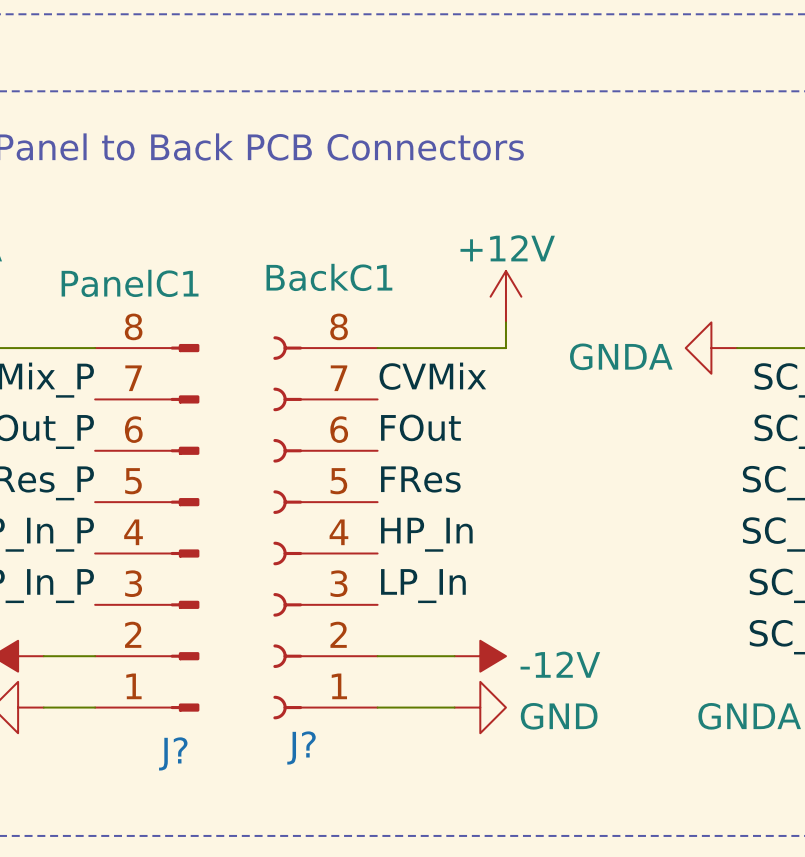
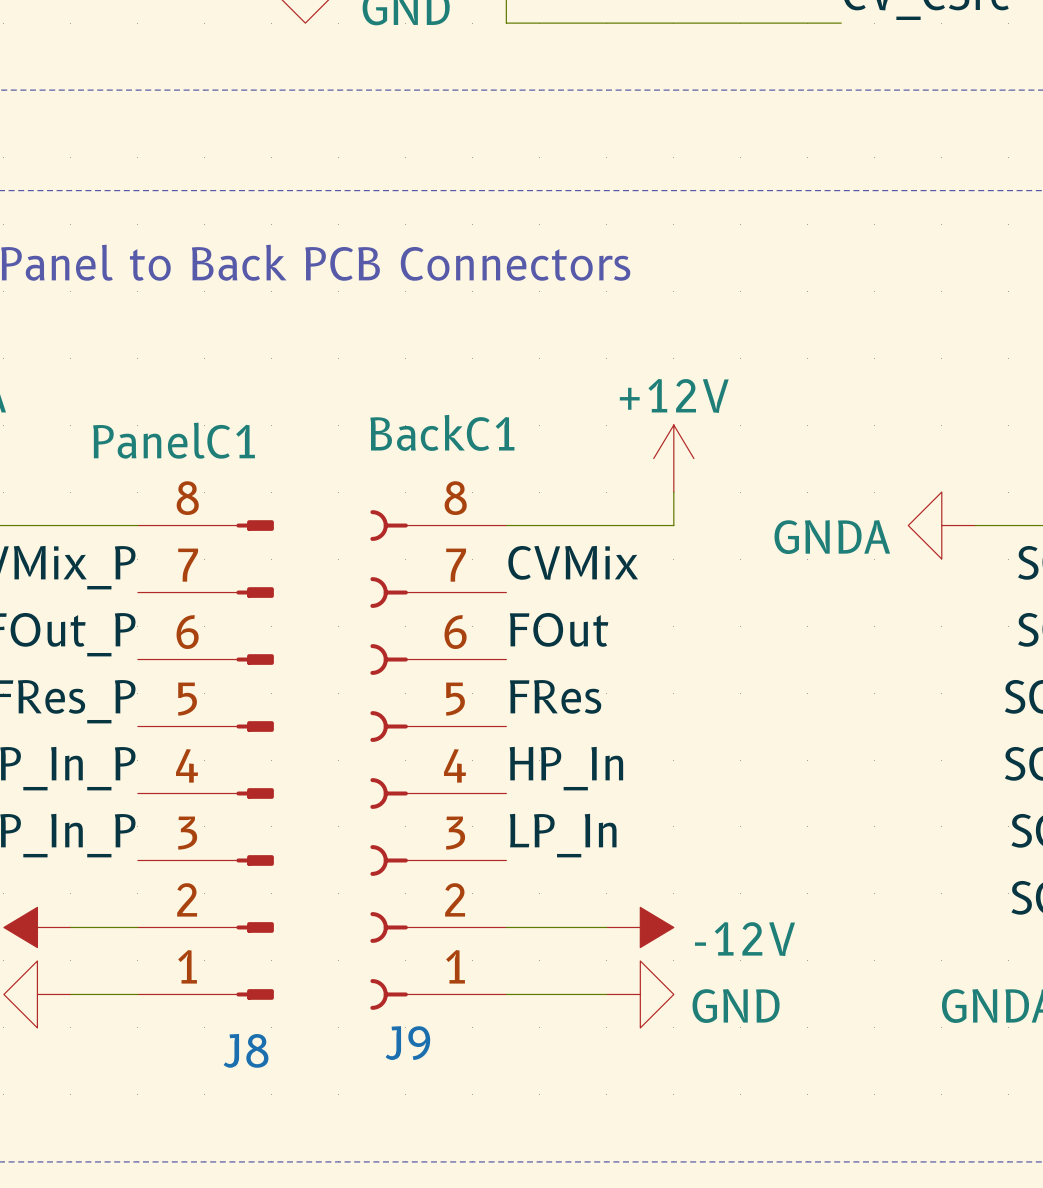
J? name: J? (301, 747) -> J9 (407, 1043)
J? name: J? (173, 753) -> J8 (246, 1050)

